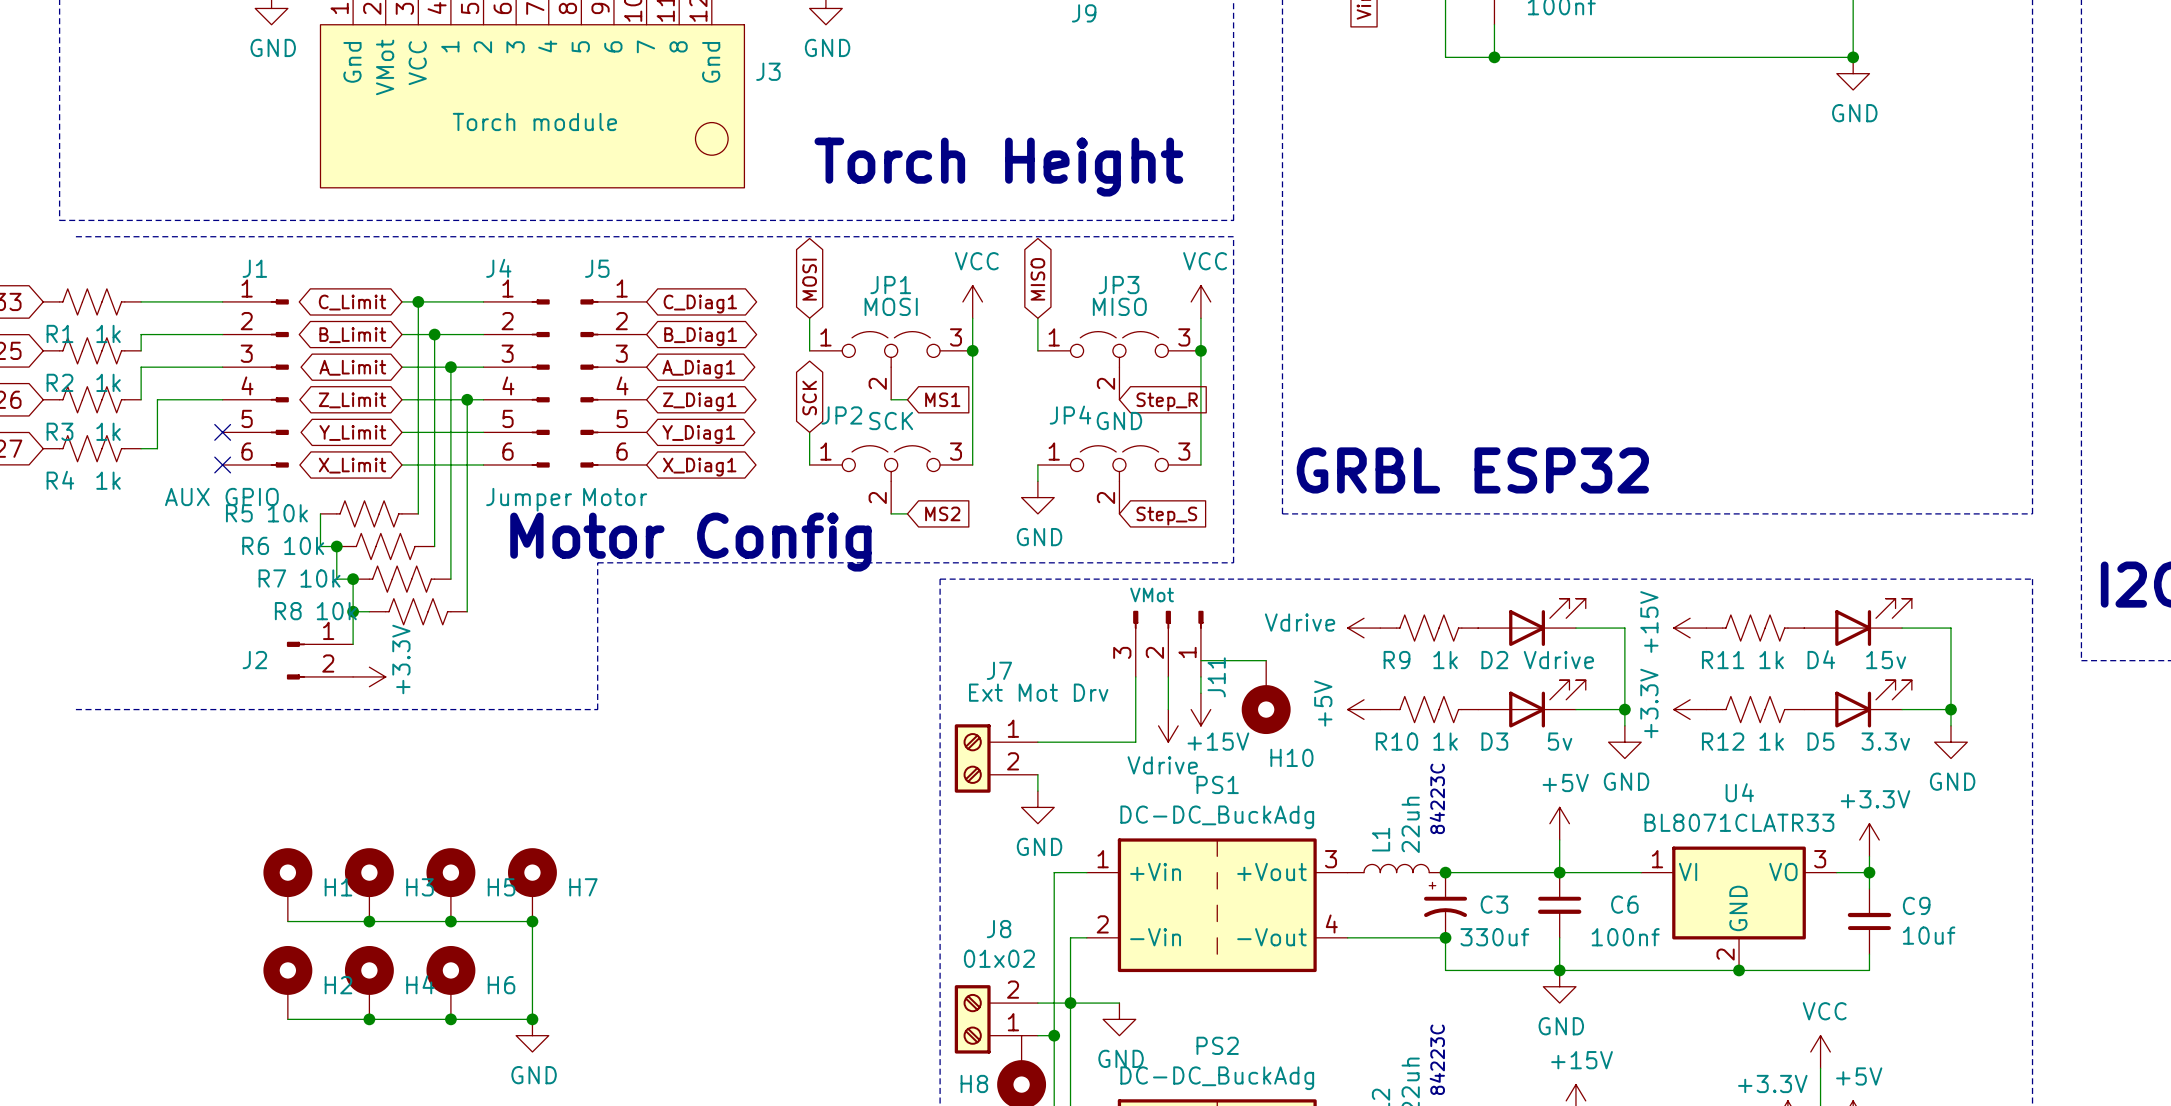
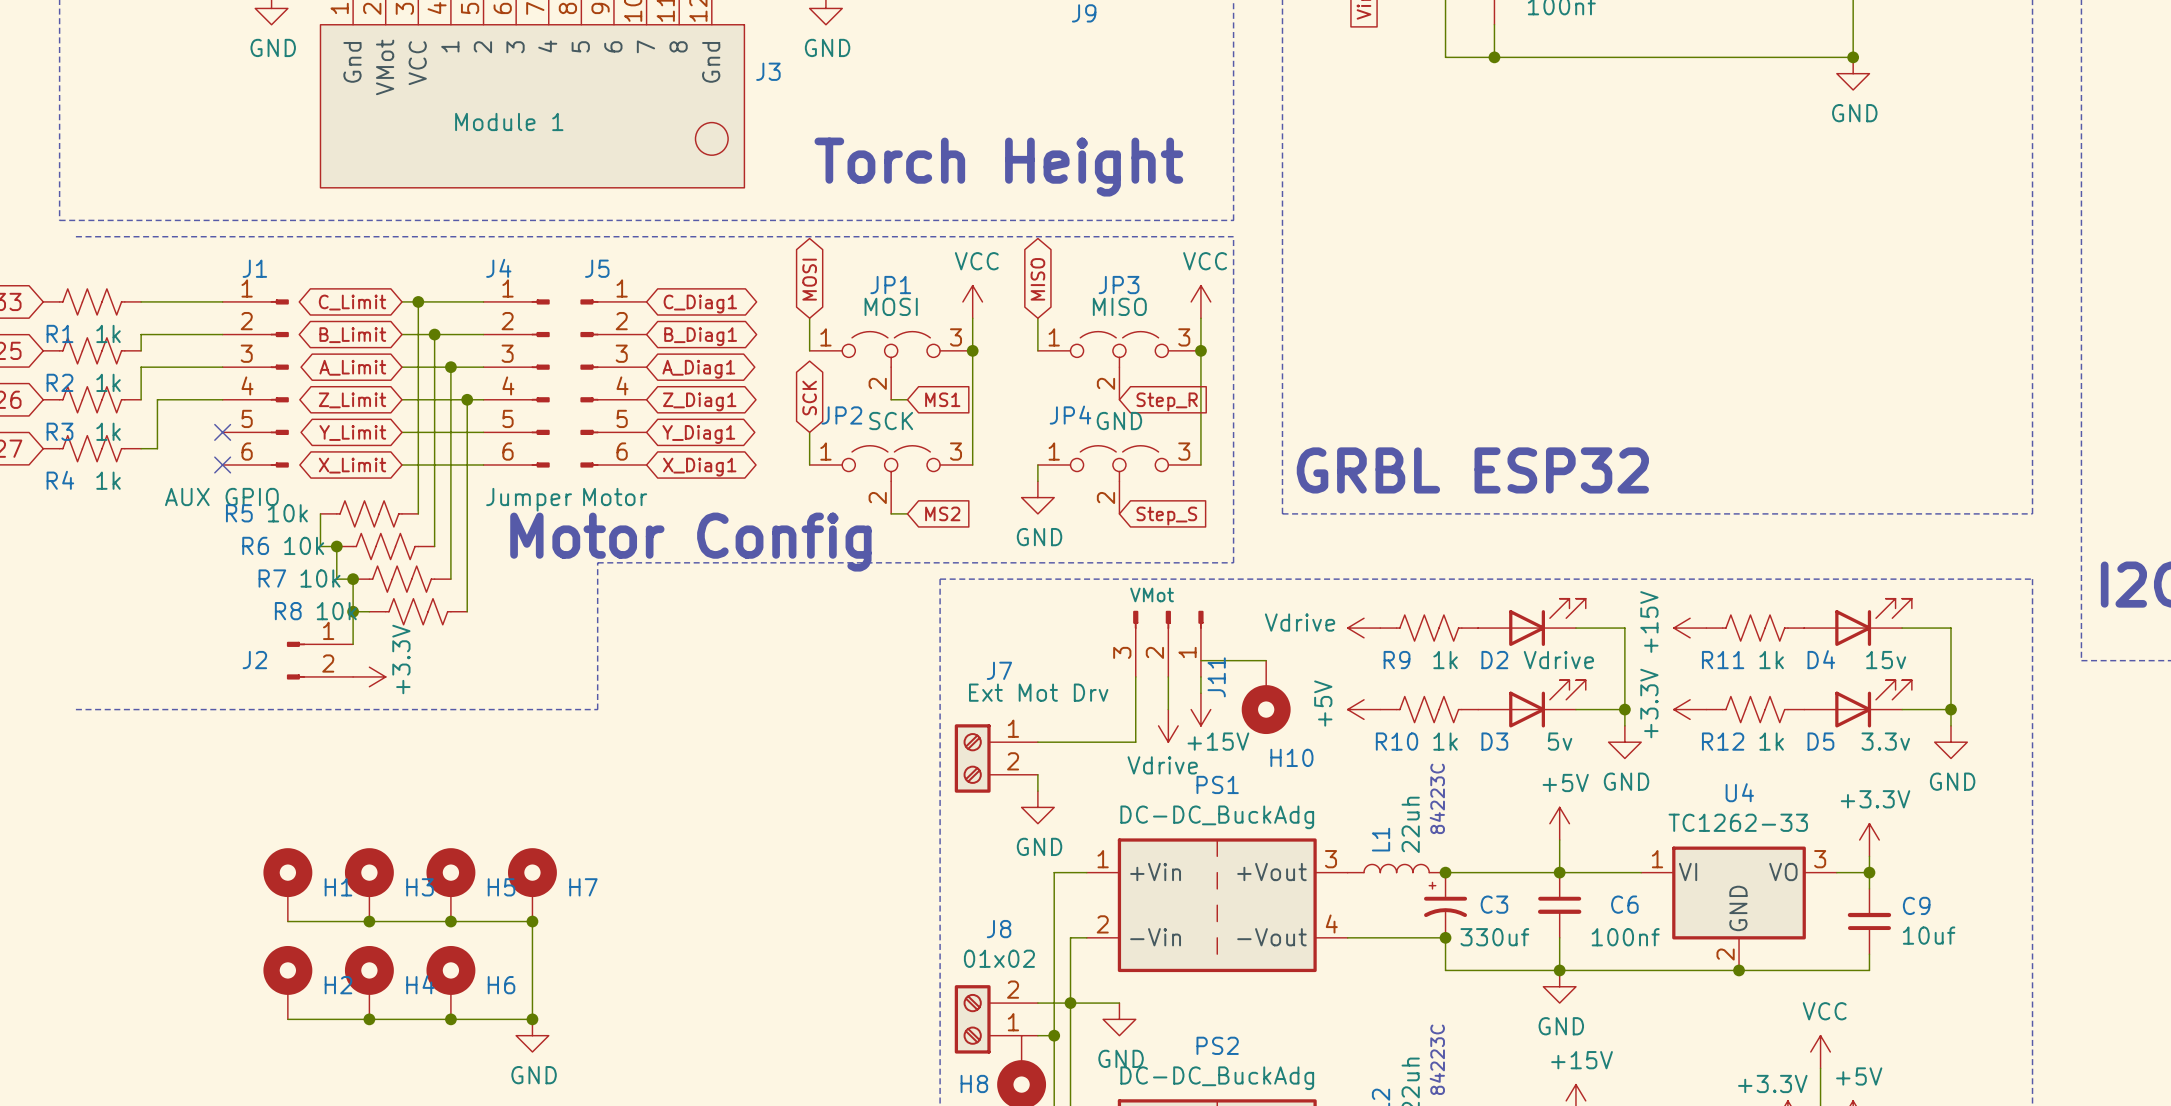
J3 value: Torch module (534, 121) -> Module 1 (509, 121)
U4 value: BL8071CLATR33 (1739, 822) -> TC1262-33 (1738, 822)

